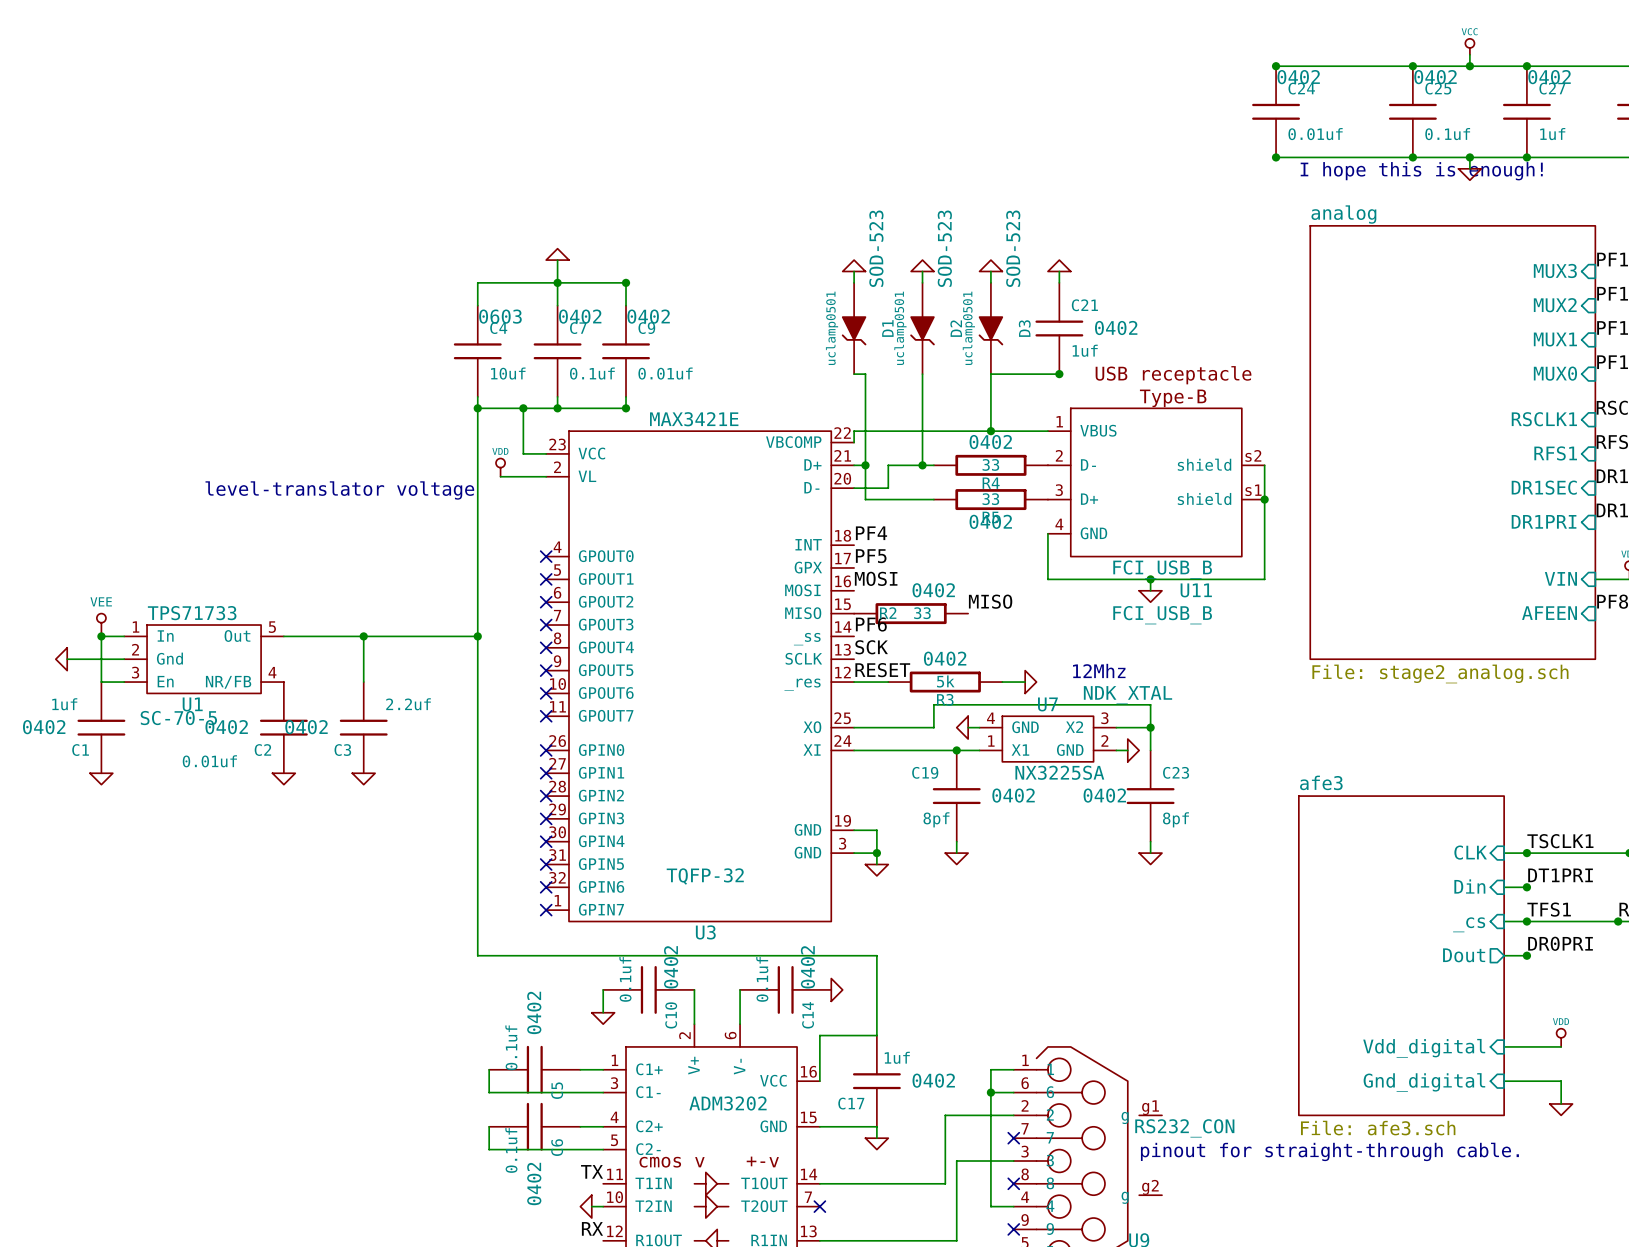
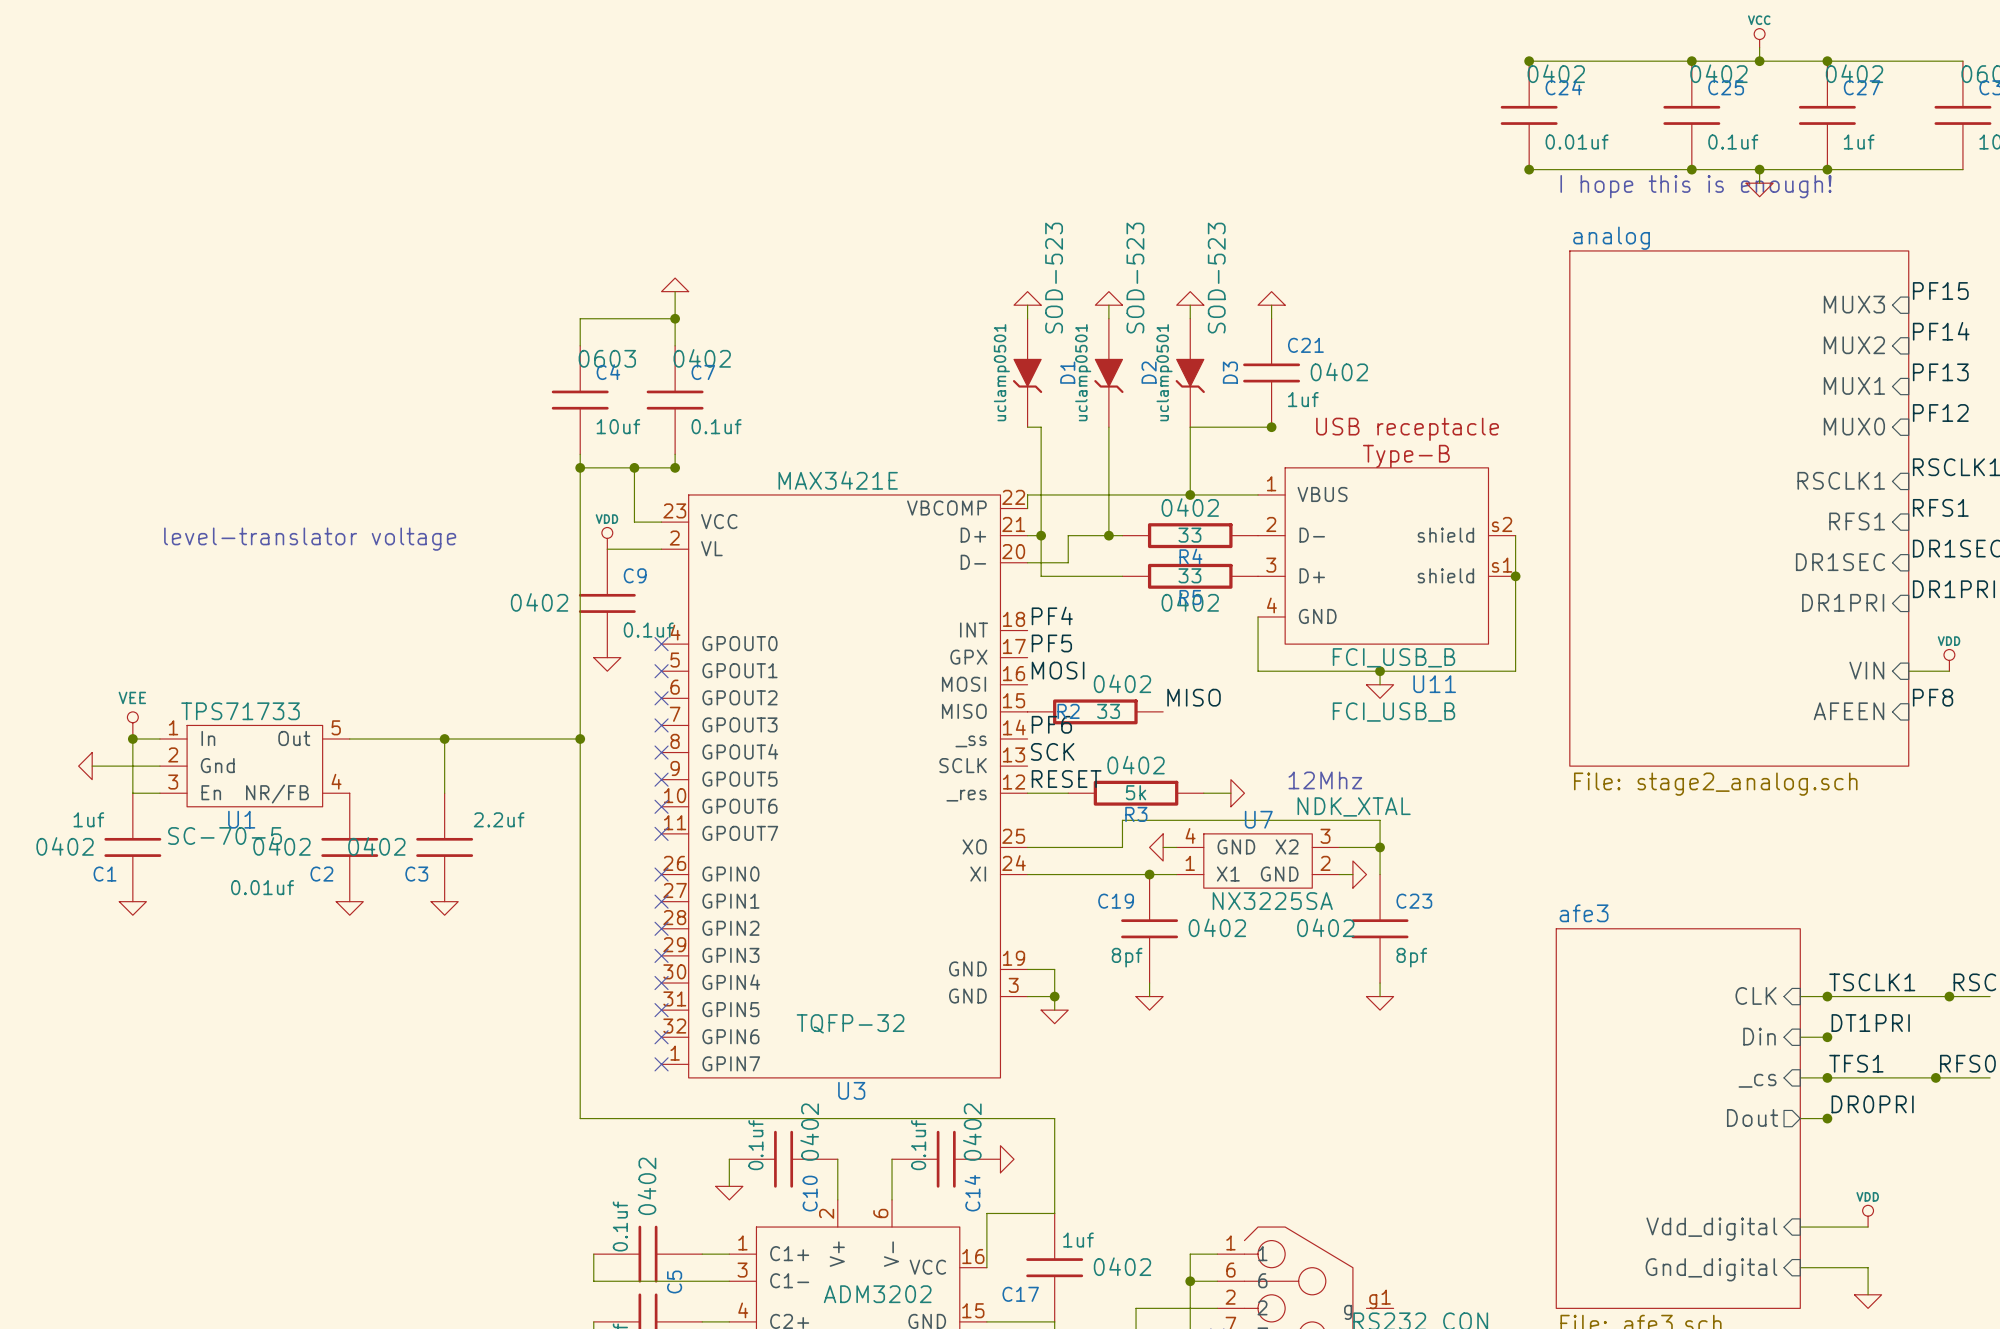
wire: (557, 282) (626, 282) (626, 305) -> none
junction: (626, 282) -> none
C9 text position: 0402 (648, 316) -> 0402 (539, 602)
C9 position: (626, 351) -> (607, 603)
C9 value: 0.01uf (665, 373) -> 0.1uf (648, 630)
wire: (626, 396) (626, 408) (557, 408) -> none
junction: (626, 408) -> none
text position: level-translator voltage (339, 490) -> level-translator voltage (310, 539)
power symbol: none -> (607, 664)

